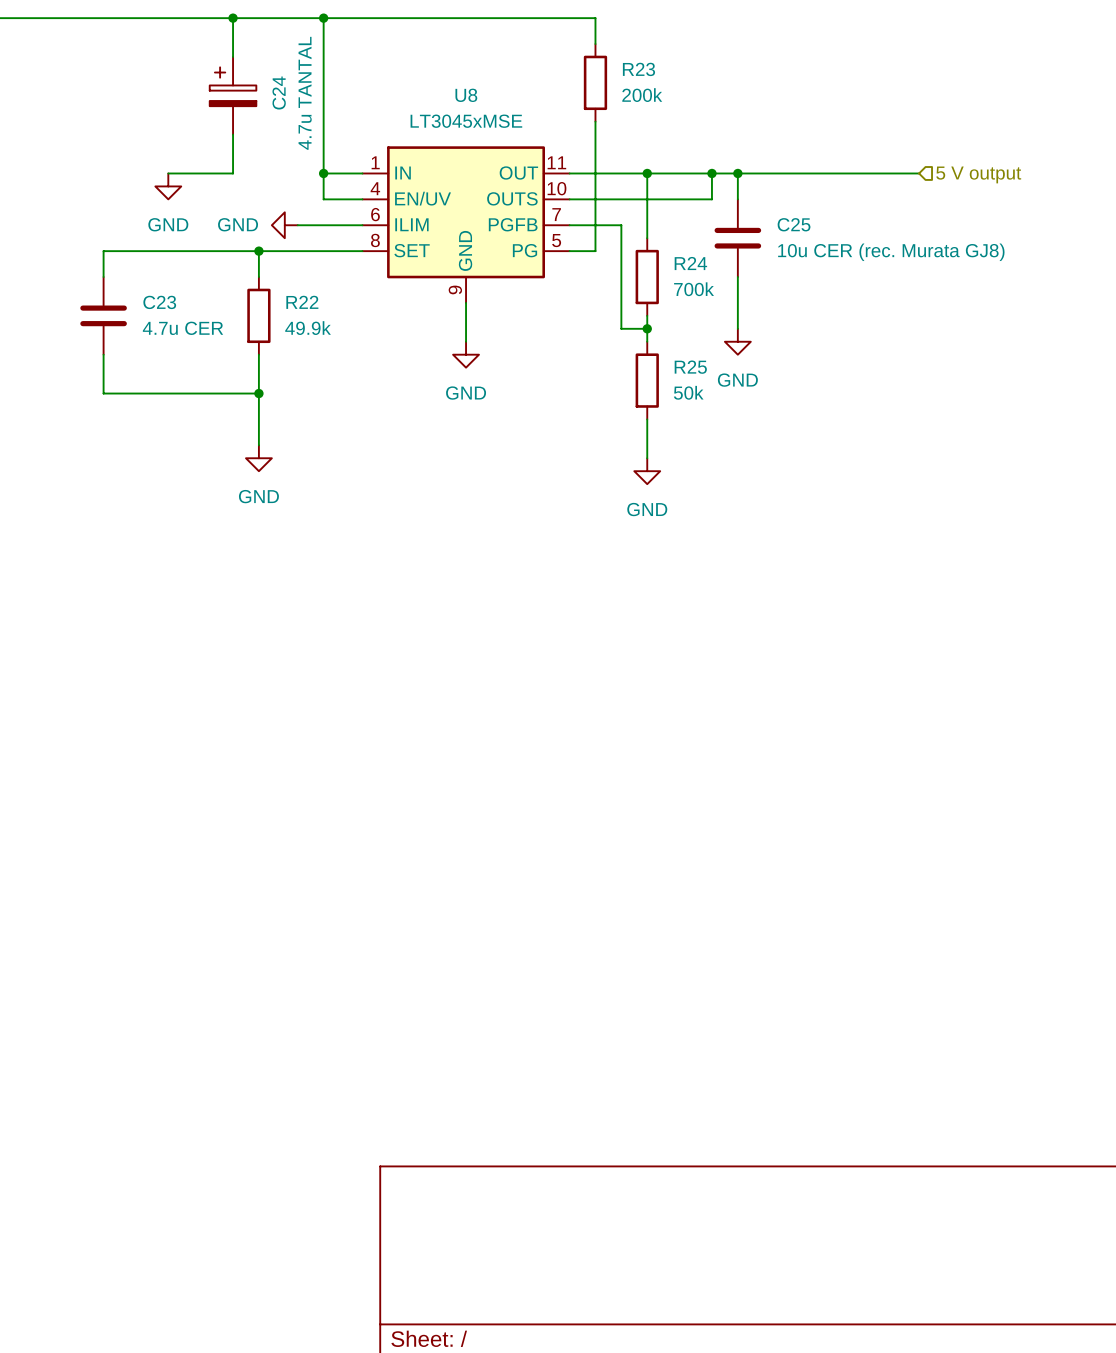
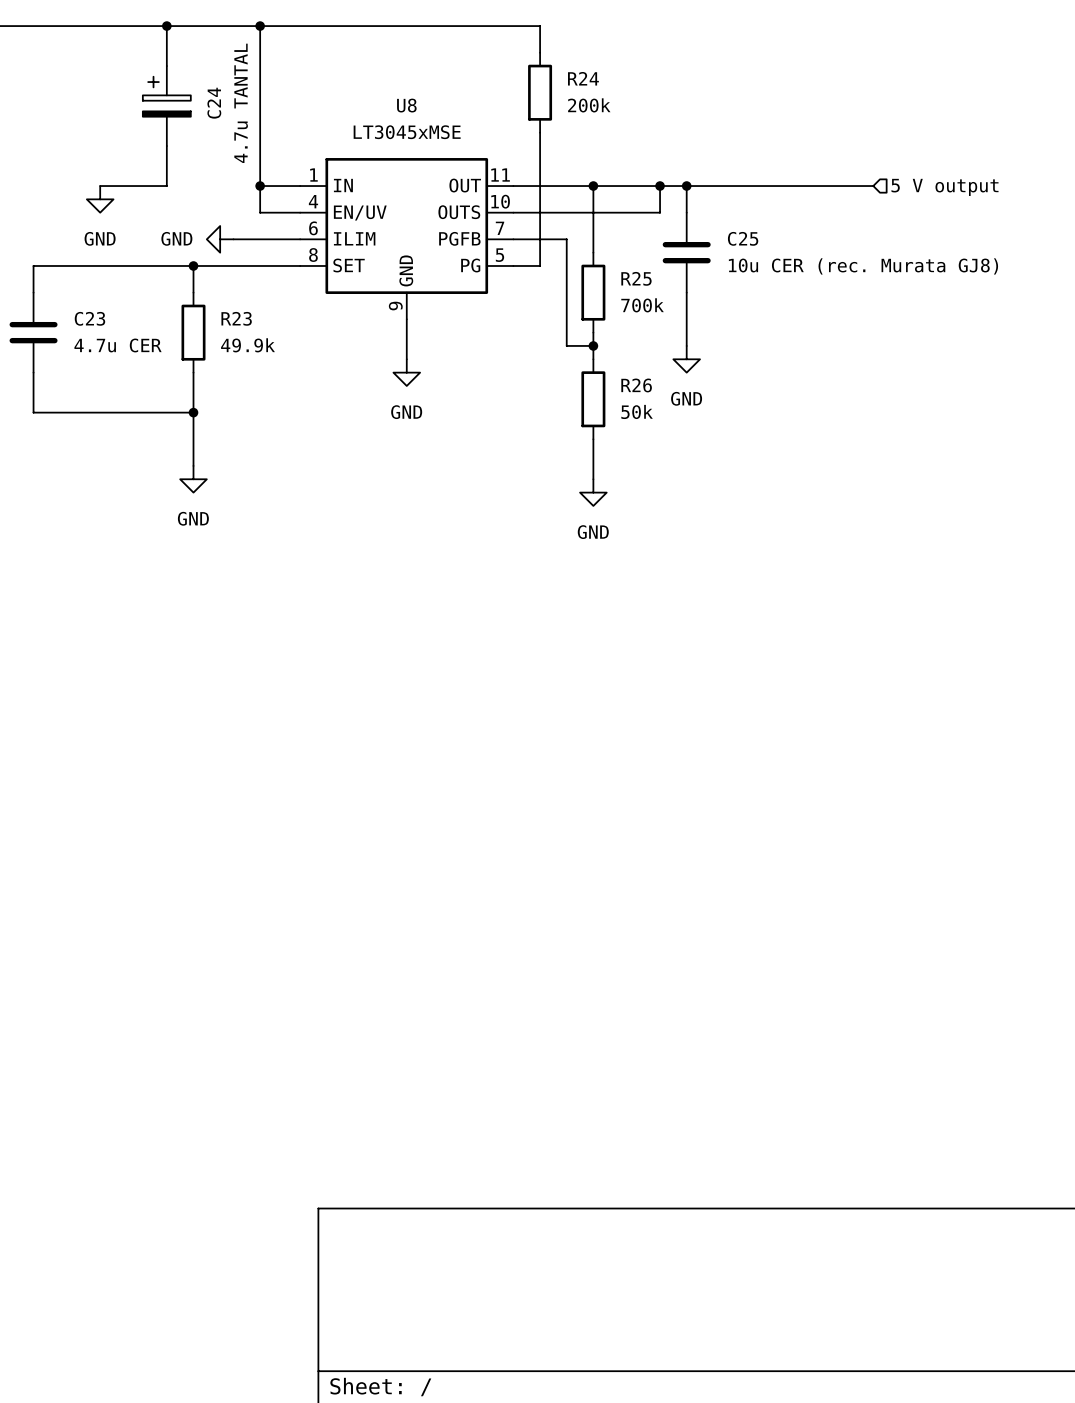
R23 name: R23 (638, 69) -> R24 (583, 78)
R24 name: R24 (690, 263) -> R25 (636, 278)
R22 name: R22 (302, 302) -> R23 (236, 318)
R25 name: R25 (690, 367) -> R26 (636, 385)

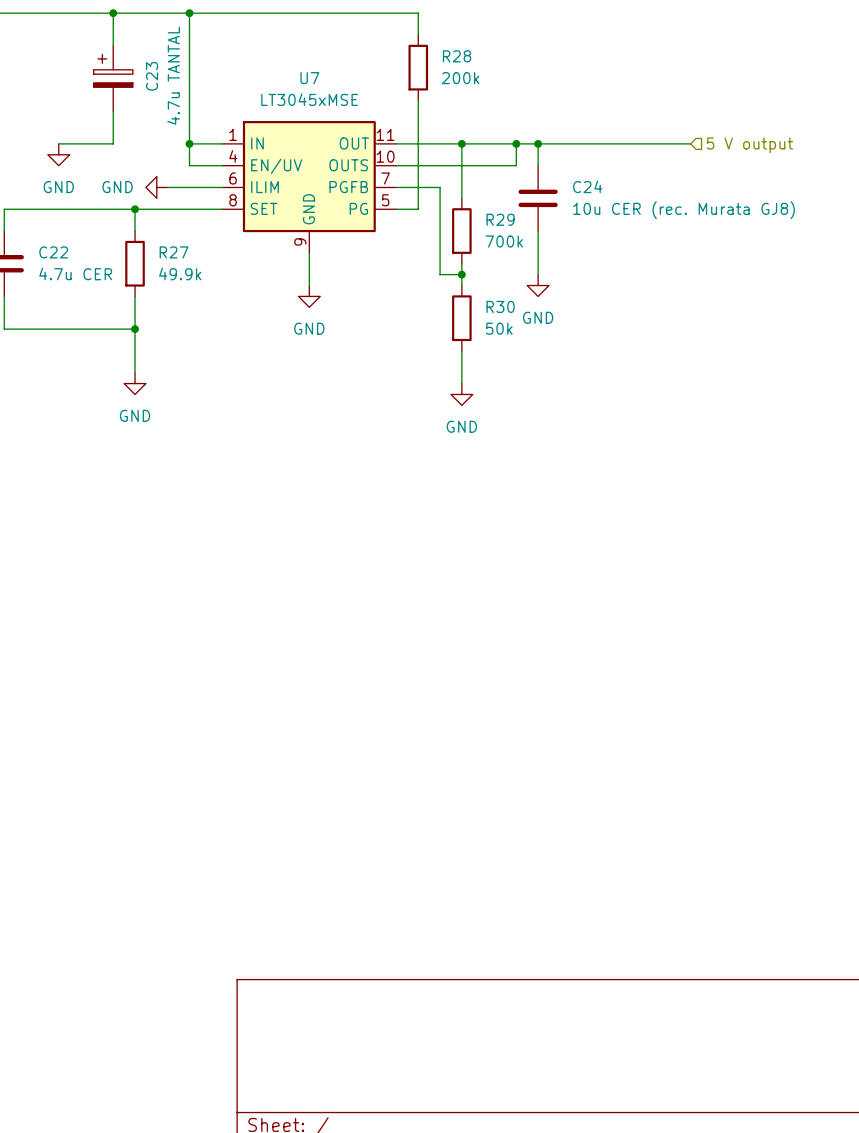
R24 name: R24 (583, 78) -> R28 (457, 56)
C24 name: C24 (214, 103) -> C23 (152, 76)
U8 name: U8 (406, 105) -> U7 (309, 78)
C25 name: C25 (743, 238) -> C24 (587, 186)
R25 name: R25 (636, 278) -> R29 (500, 219)
C23 name: C23 (89, 318) -> C22 (53, 252)
R23 name: R23 (236, 318) -> R27 (174, 252)
R26 name: R26 (636, 385) -> R30 (500, 306)

